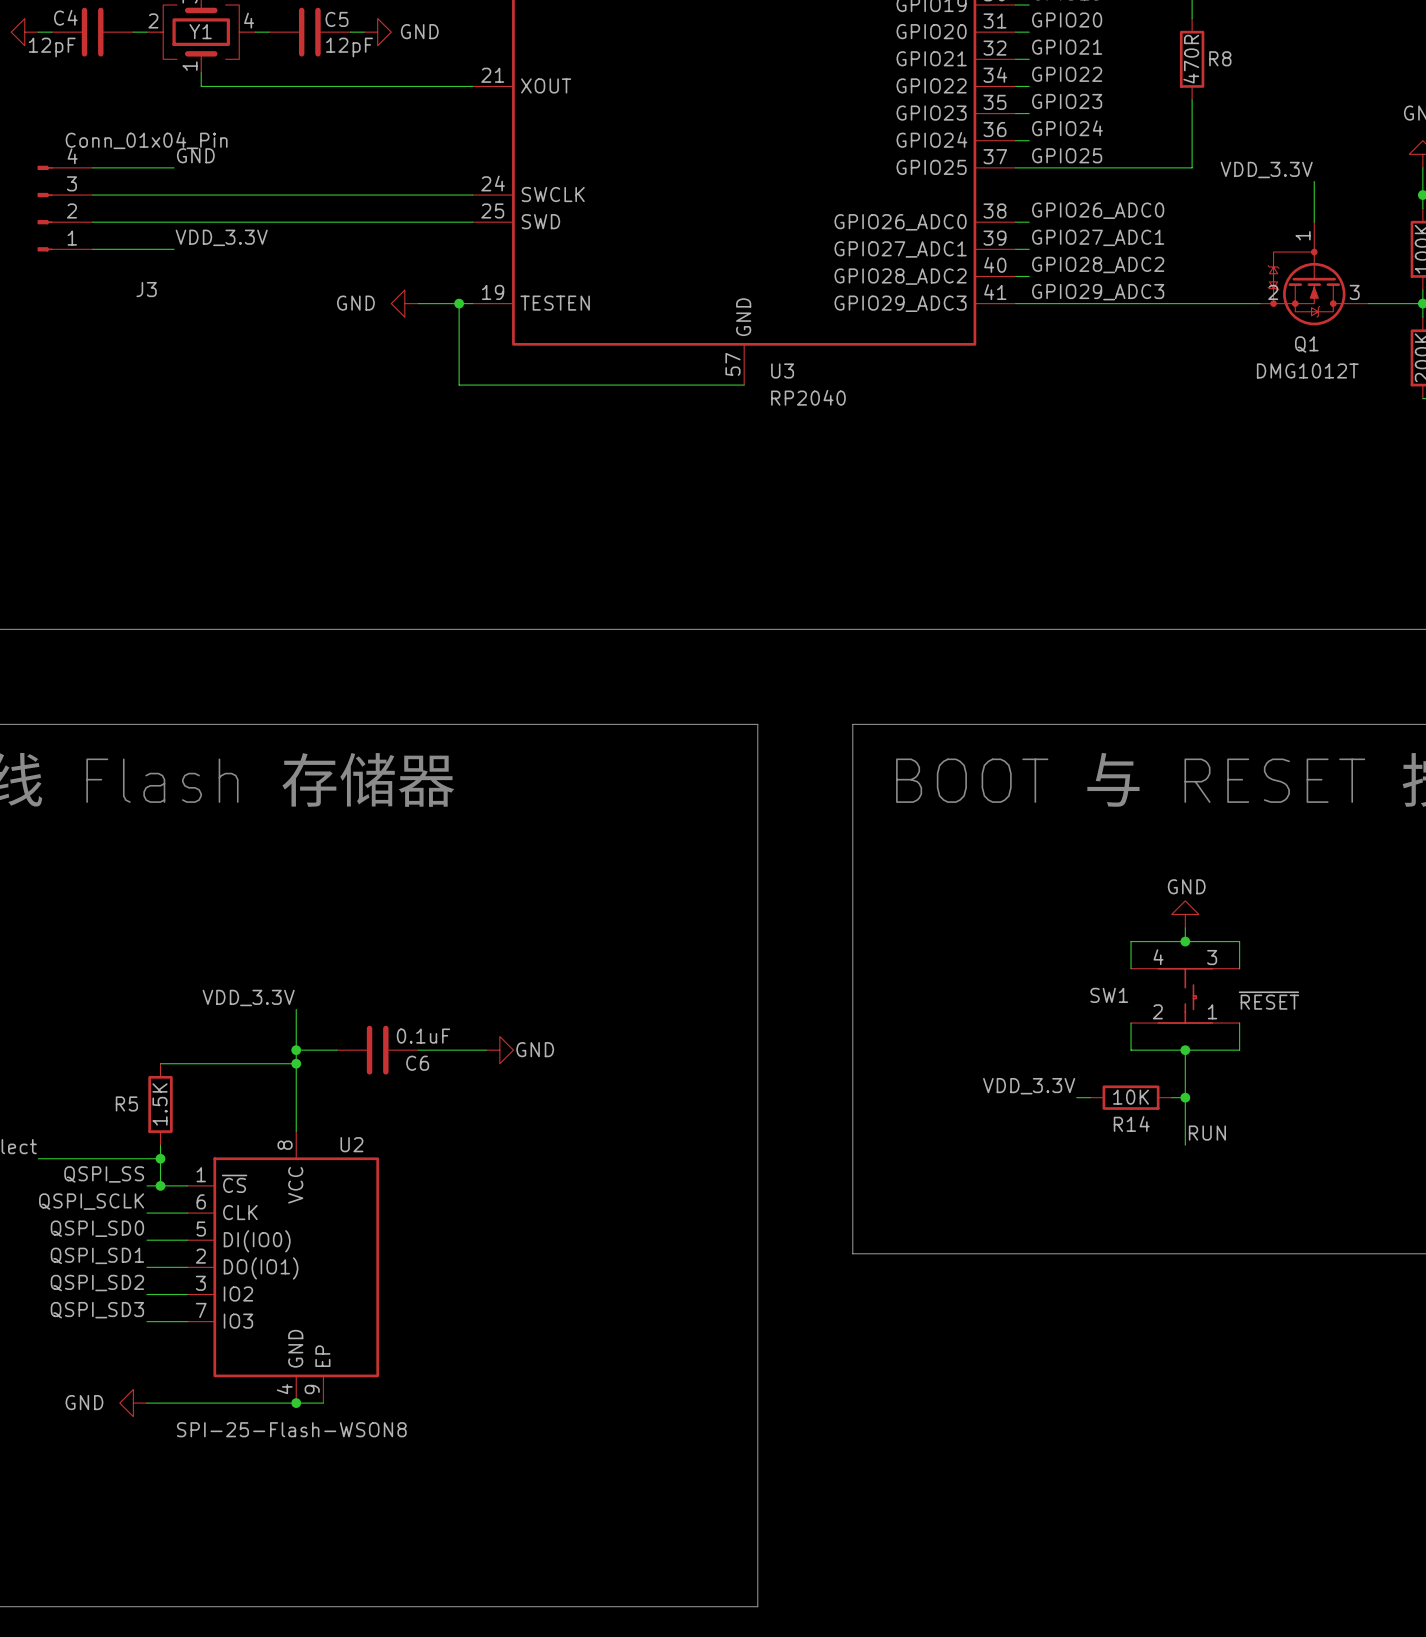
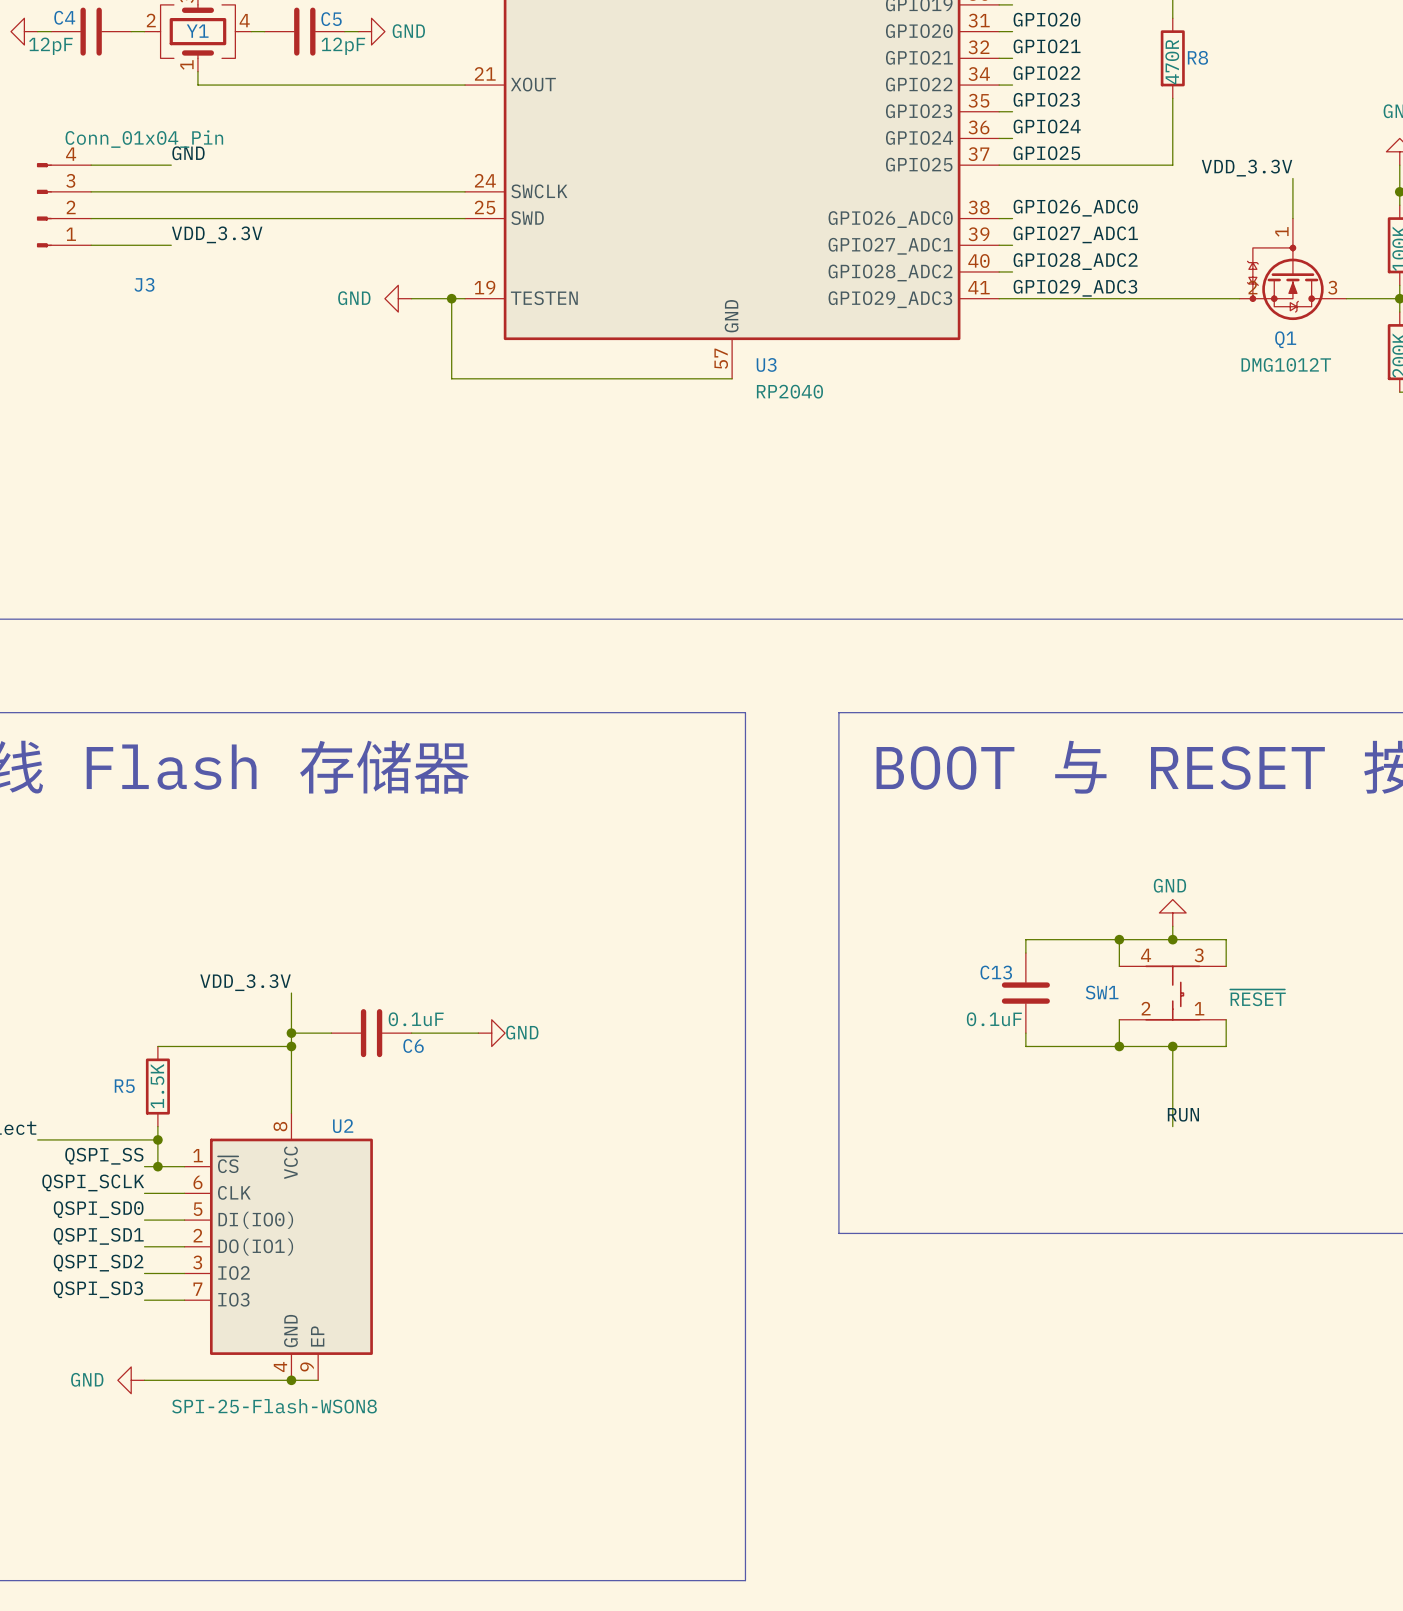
power symbol position: GND (1185, 914) -> GND (1172, 912)
wire: (1185, 928) (1185, 941) -> (1172, 926) (1172, 939)
junction position: (1185, 941) -> (1172, 939)
wire: none -> (1119, 939) (1119, 966)
junction: none -> (1119, 939)
wire: none -> (1025, 953) (1025, 939) (1226, 939) (1226, 966)
wire: (1131, 968) (1131, 941) (1239, 941) (1239, 968) -> none
SW1 position: (1185, 995) -> (1172, 993)
C13: none -> 0.1uF (1025, 993)
wire: (1131, 1023) (1131, 1050) (1239, 1050) (1239, 1023) -> none
wire: none -> (1119, 1019) (1119, 1046)
wire: none -> (1226, 1019) (1226, 1046) (1025, 1046) (1025, 1033)
wire: (1185, 1050) (1185, 1145) -> none
junction position: (1185, 1050) -> (1172, 1046)
junction: none -> (1119, 1046)
wire: none -> (1172, 1046) (1172, 1126)
label: VDD_3.3V (1029, 1086) -> none
wire: (1076, 1097) (1090, 1097) -> none
R14: 10K (1131, 1097) -> none
wire: (1171, 1097) (1185, 1097) -> none
junction: (1185, 1097) -> none

